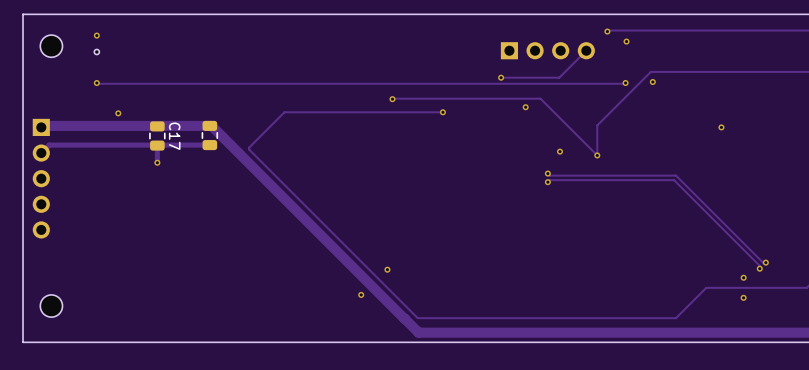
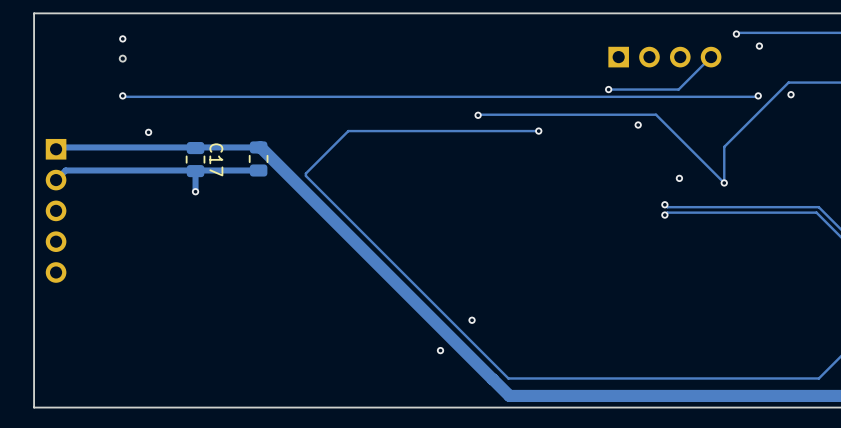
part: (51, 46) -> none
track width: thick (209, 125) (41, 127) -> thin (258, 147) (57, 147) (56, 149)
part: (51, 306) -> none

